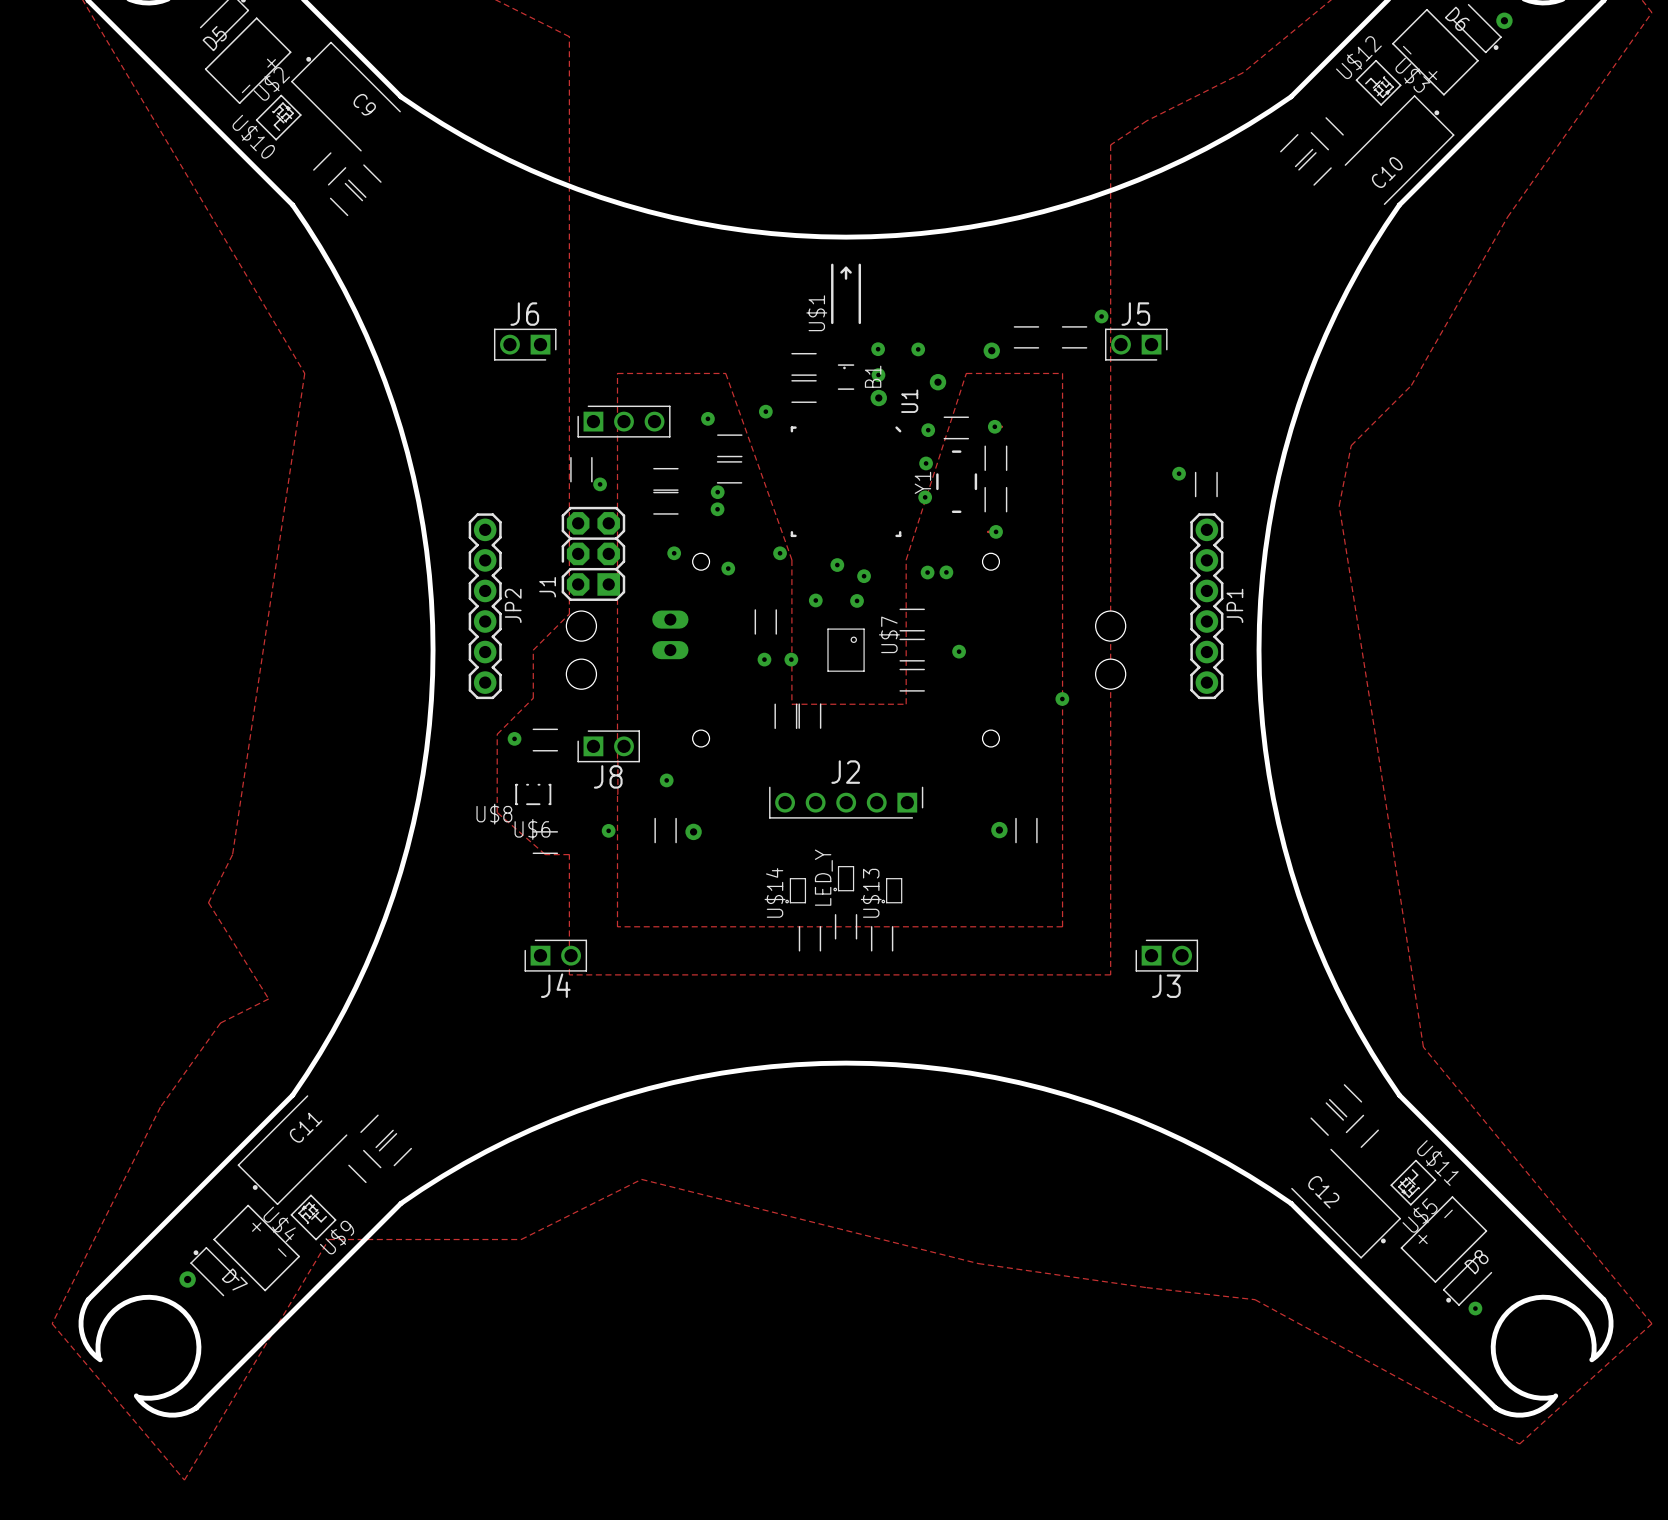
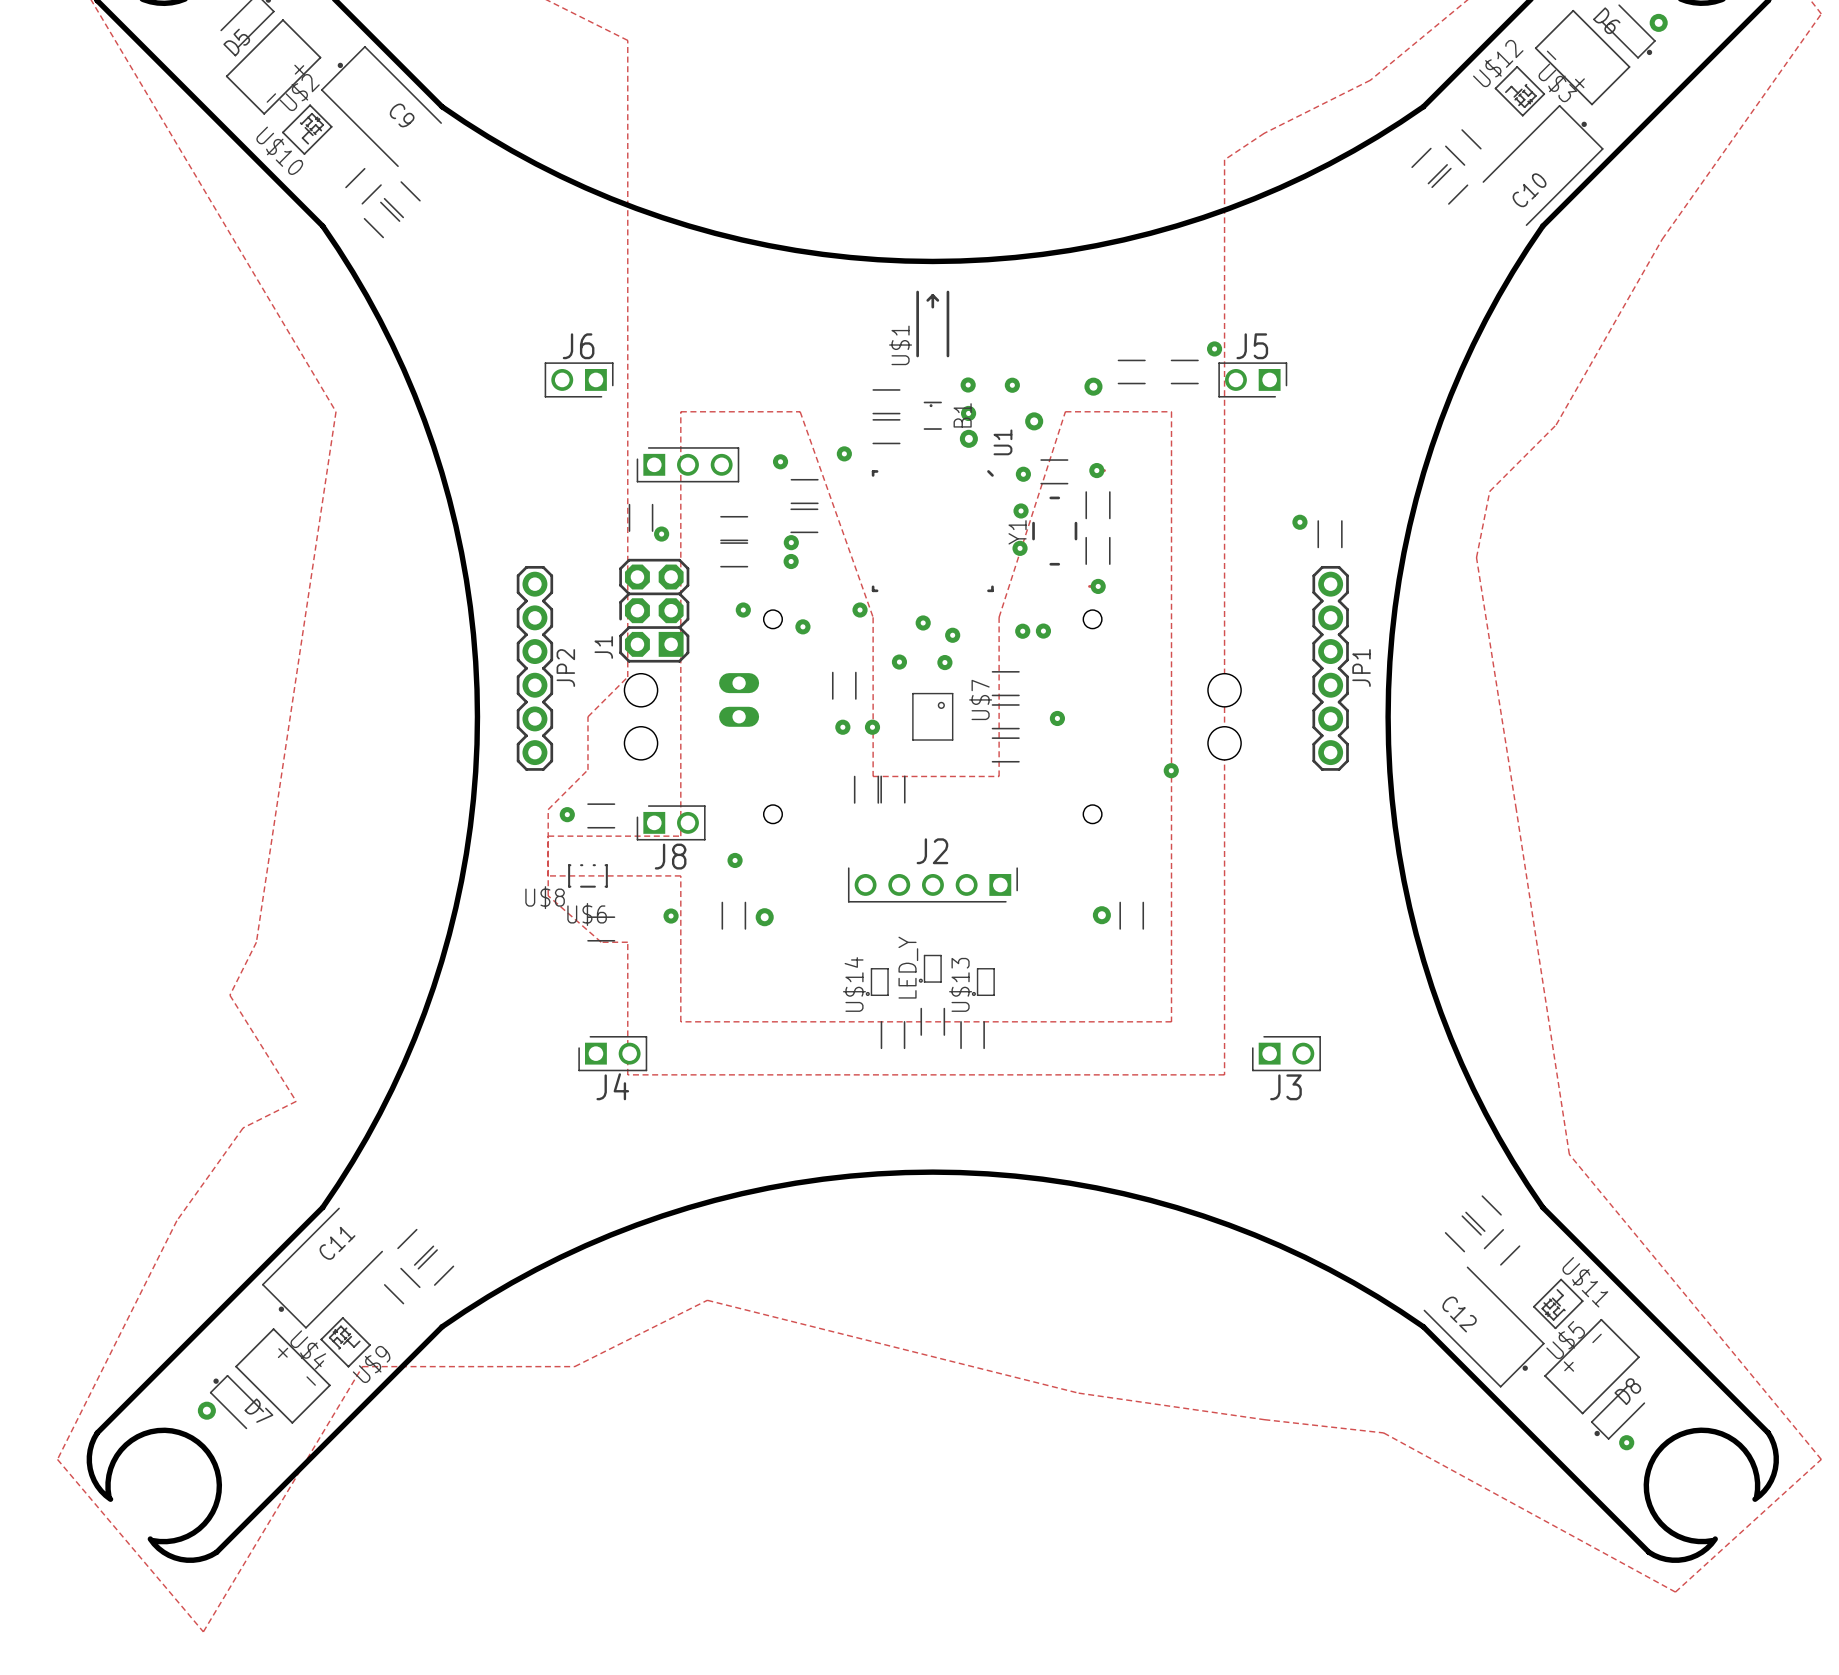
zone outline: (617, 758) (617, 794) -> (680, 836) (548, 836)
zone outline: none -> (548, 875) (680, 875)

